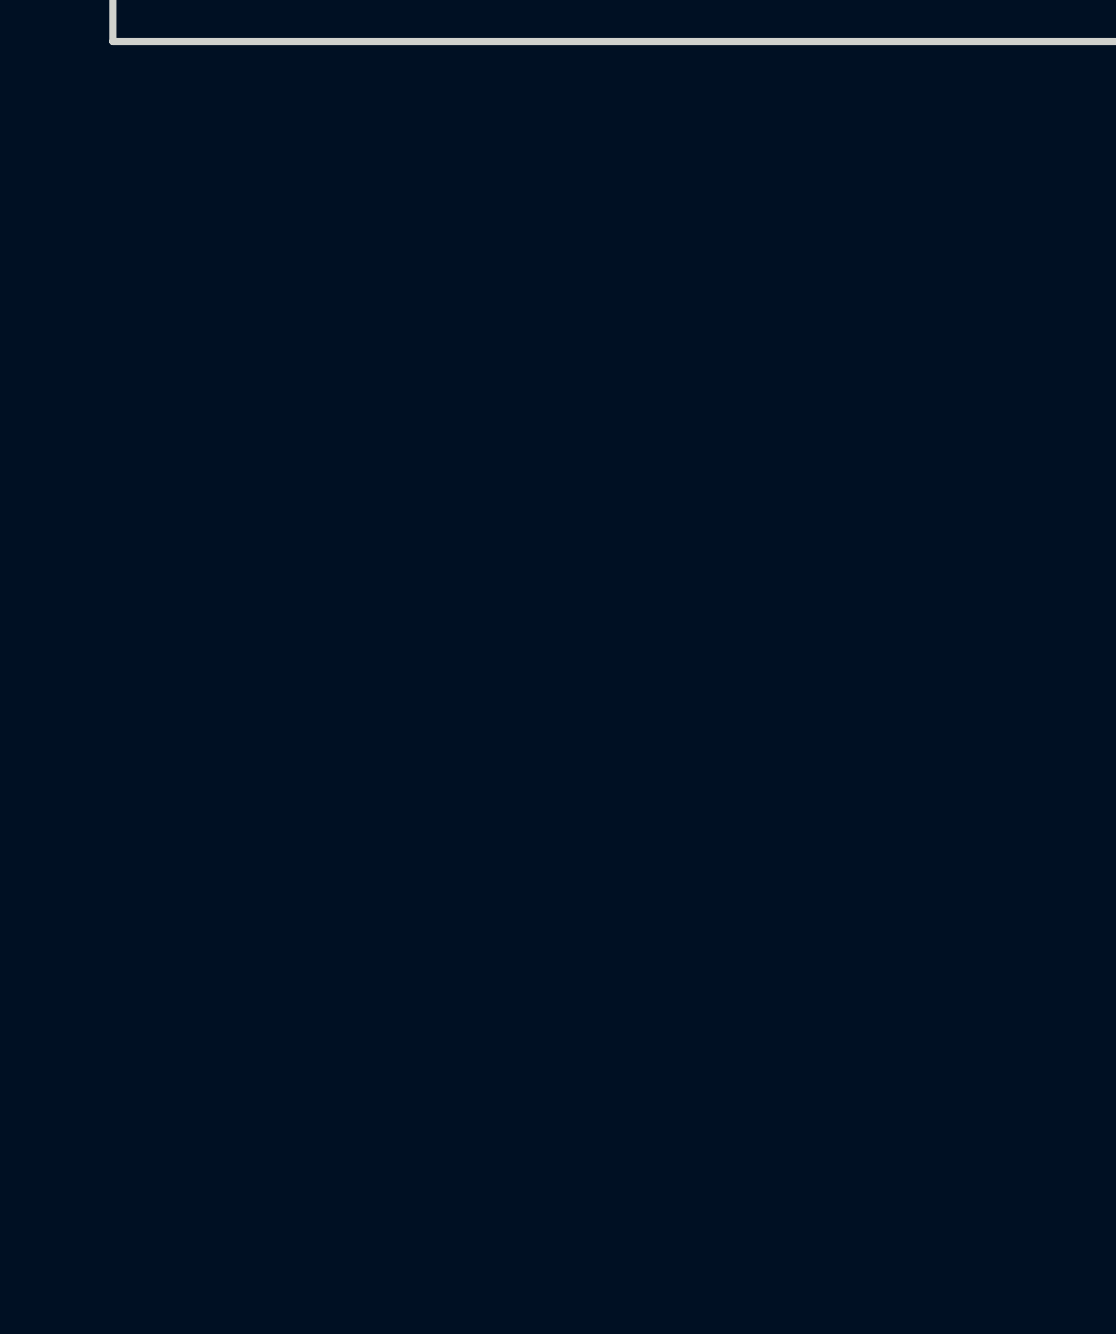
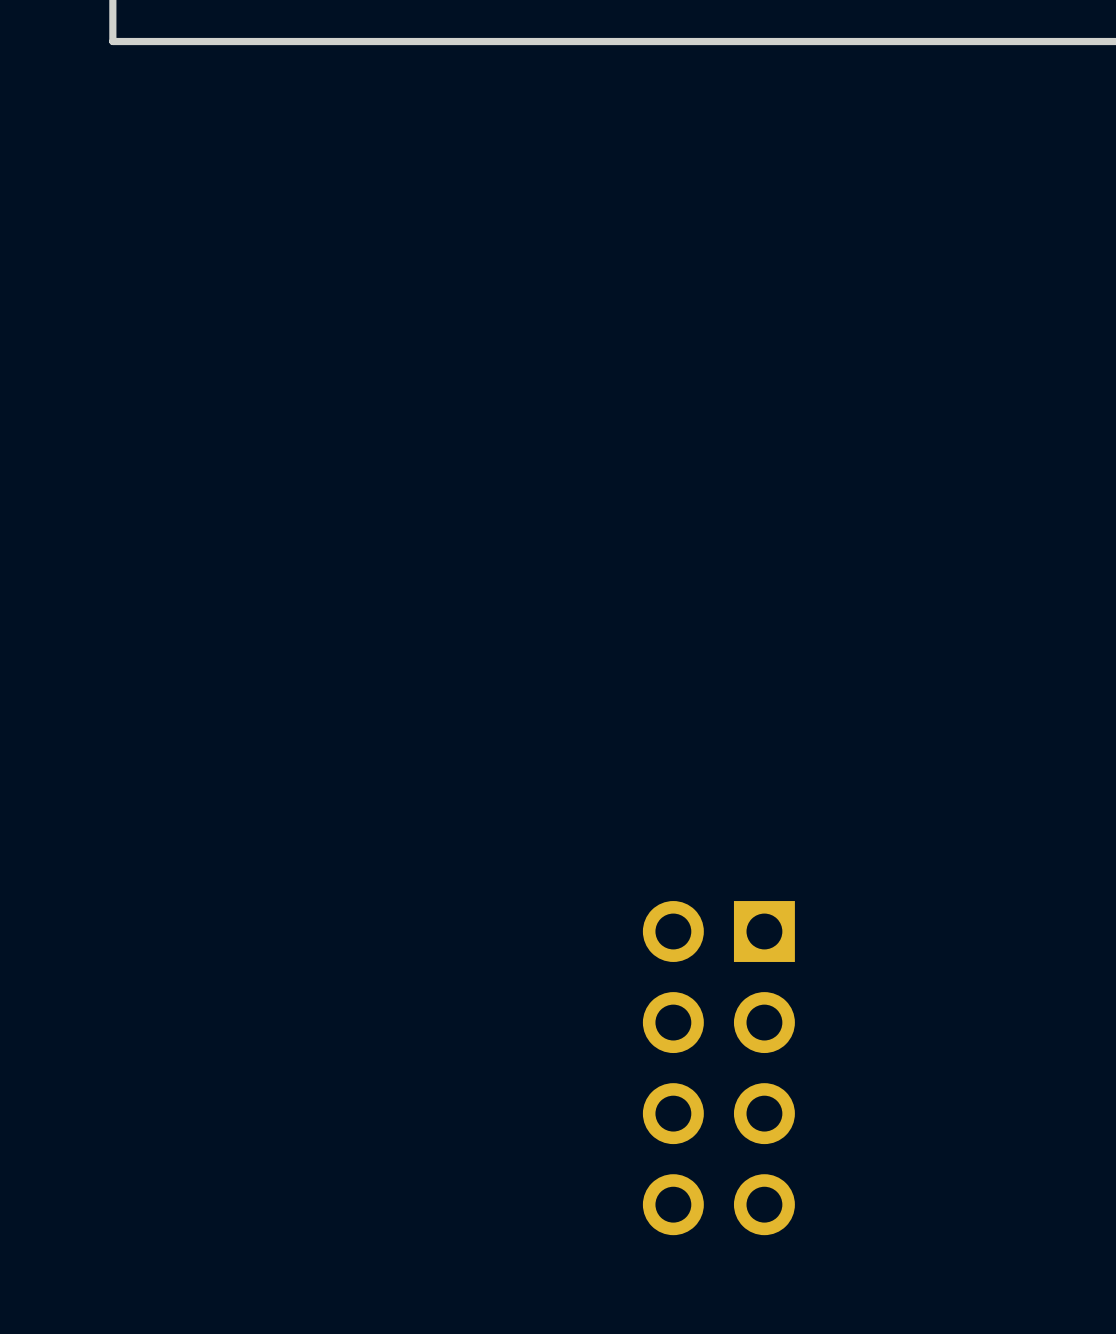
part: none -> (718, 1068)

